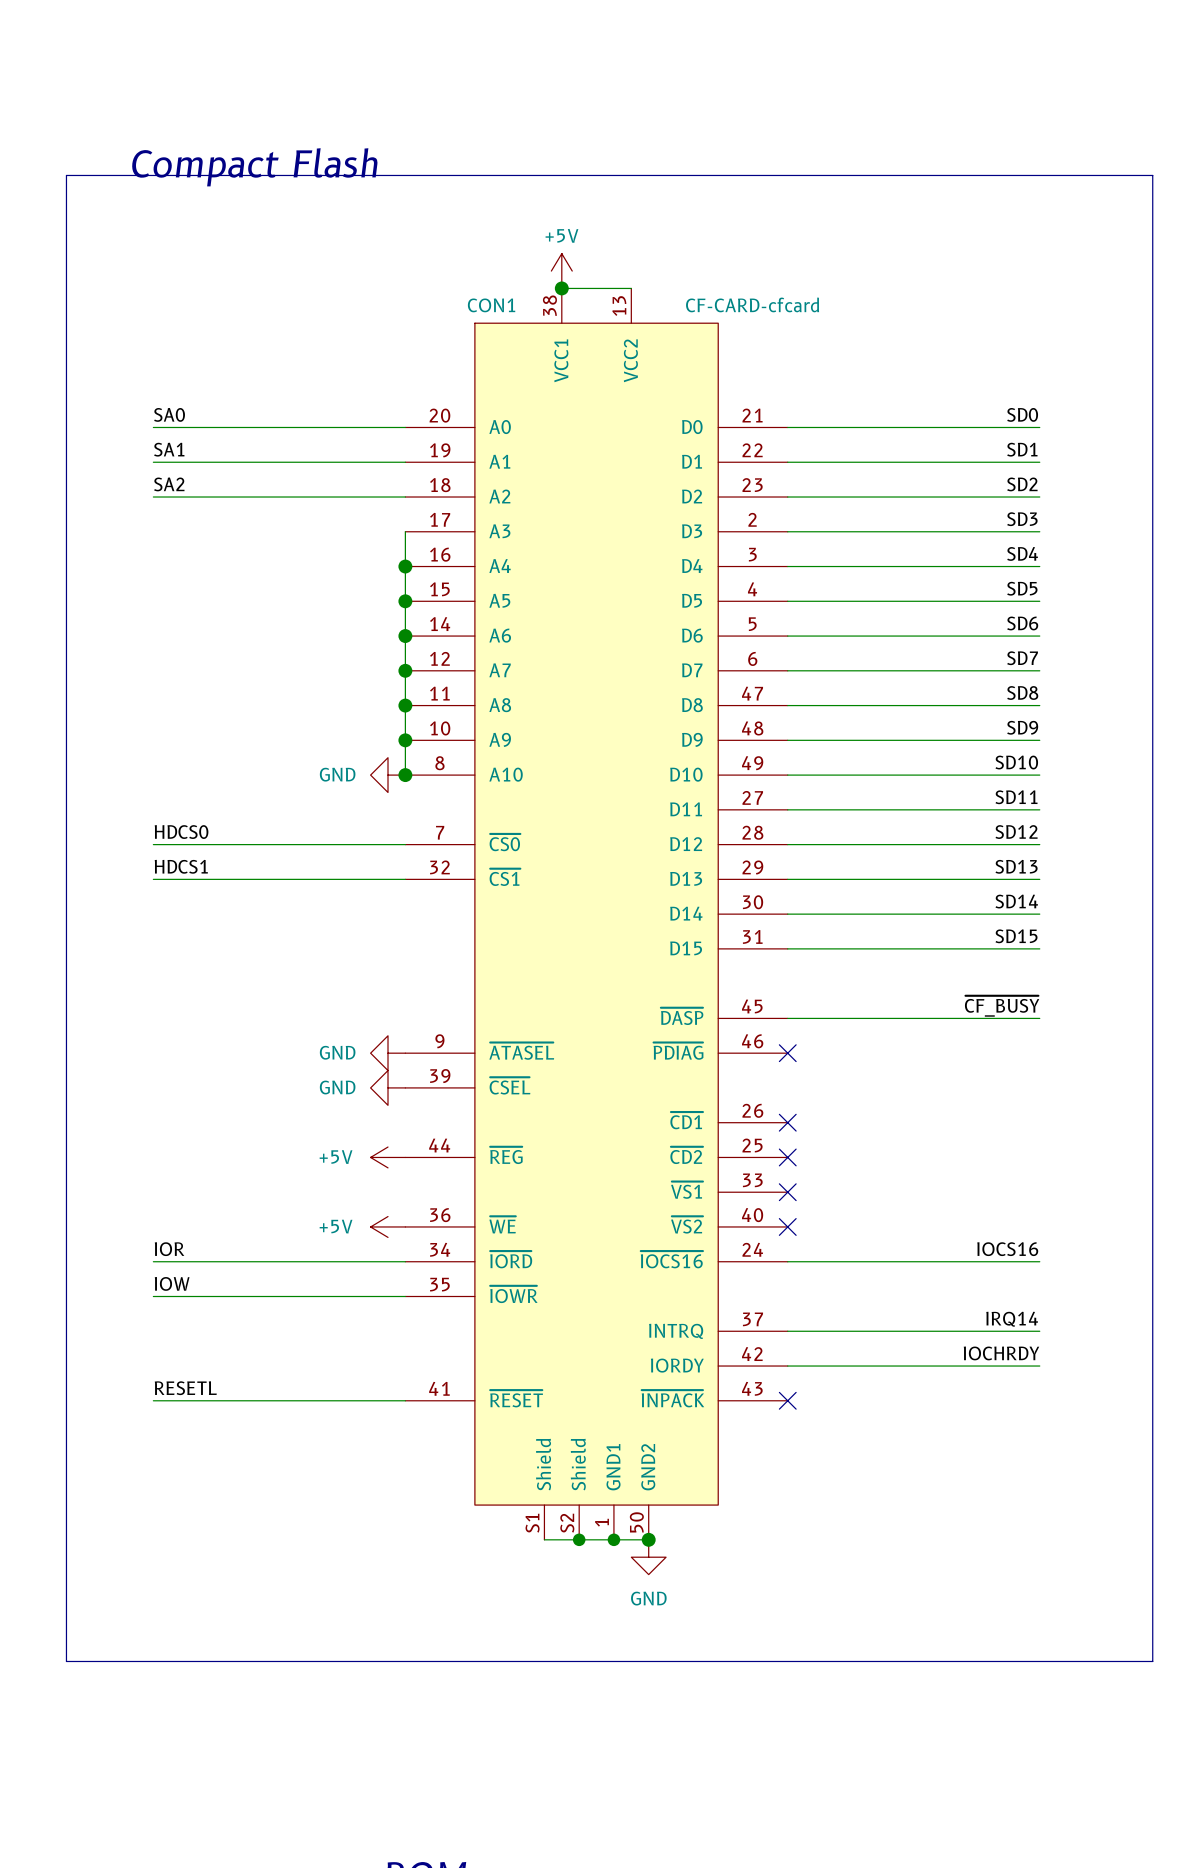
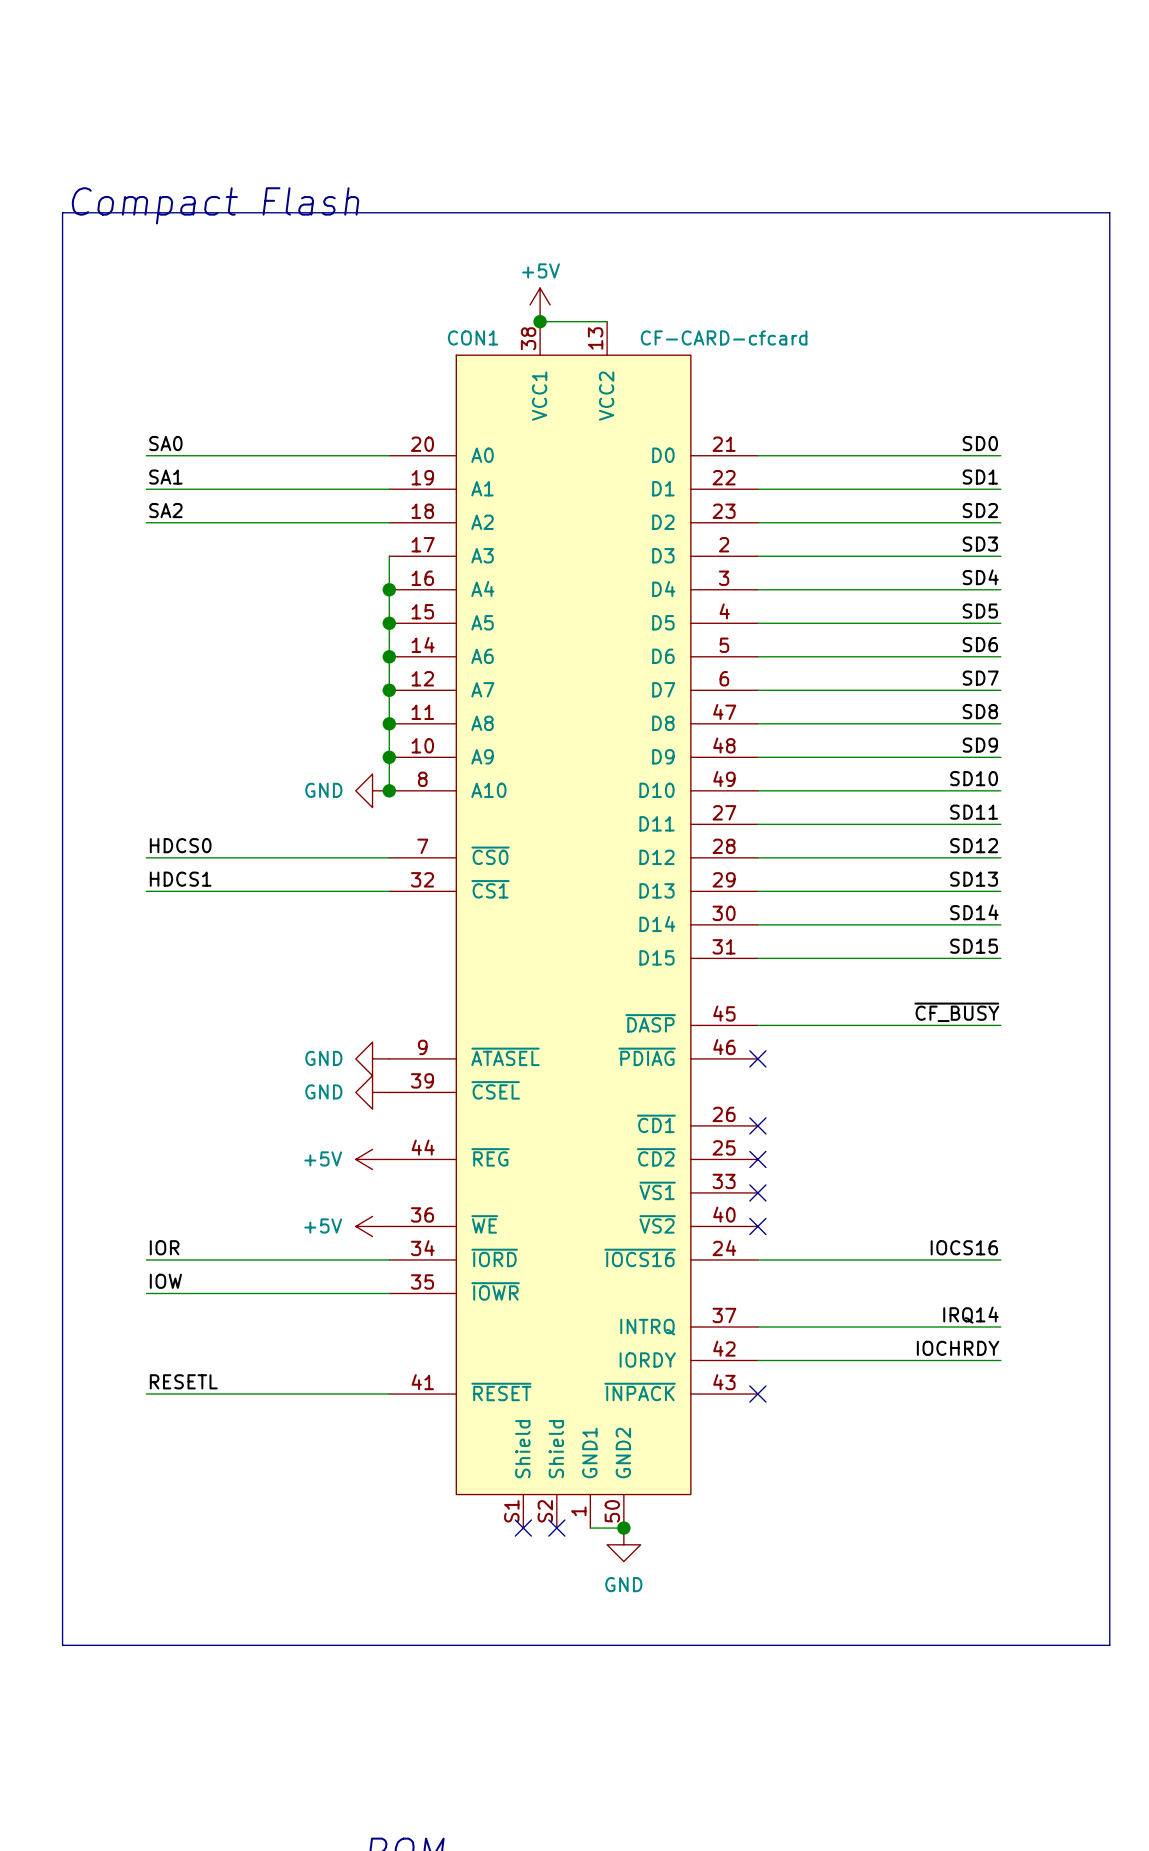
wire: (544, 1539) (613, 1539) -> none
no-connect mark: none -> (523, 1528)
junction: (579, 1539) -> none
no-connect mark: none -> (556, 1528)
junction: (613, 1539) -> none

